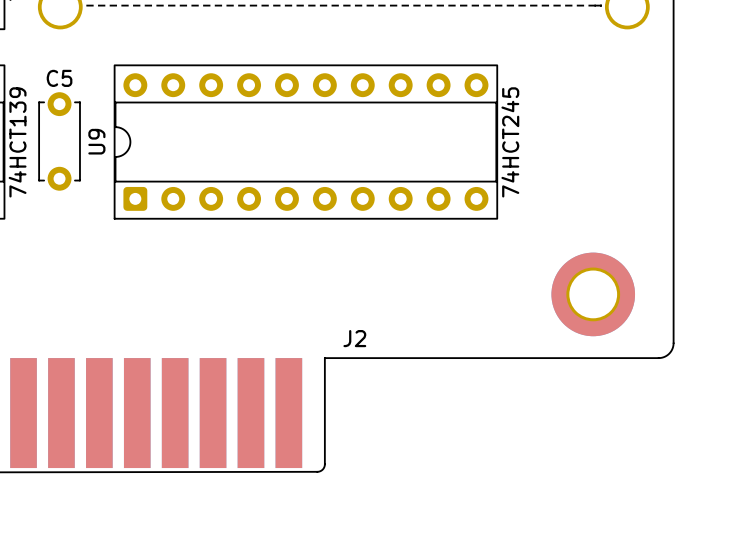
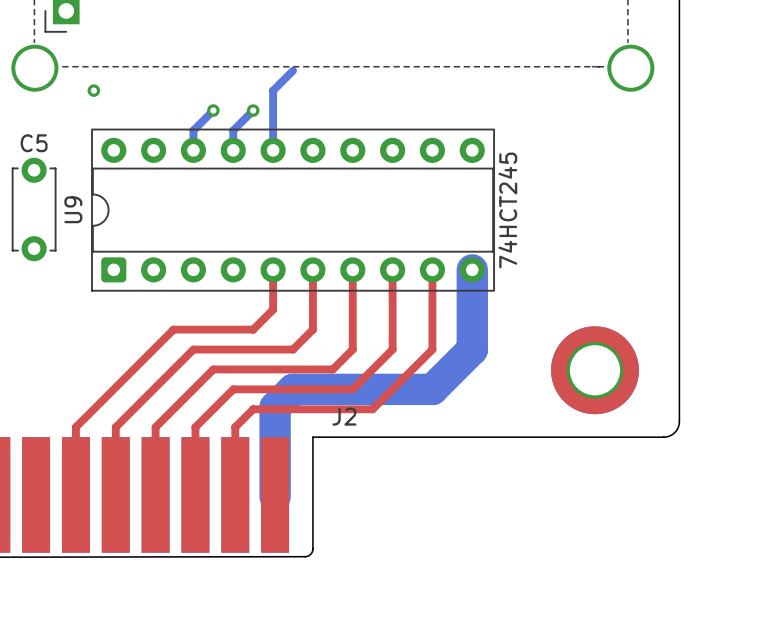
bottom track: none -> (293, 70) (273, 90) (273, 150)
via: none -> (93, 90)
bottom track: none -> (213, 110) (193, 130) (193, 150)
via: none -> (213, 110)
bottom track: none -> (253, 110) (233, 130) (233, 150)
via: none -> (253, 110)
top track: none -> (273, 269) (273, 309) (253, 329) (173, 329) (75, 427) (75, 496)
top track: none -> (312, 269) (312, 329) (293, 349) (193, 349) (115, 427) (115, 496)
top track: none -> (352, 269) (352, 349) (332, 369) (213, 369) (155, 427) (155, 496)
top track: none -> (392, 269) (392, 349) (352, 389) (233, 389) (195, 427) (195, 496)
top track: none -> (432, 269) (432, 349) (372, 409) (253, 409) (235, 427) (235, 496)
bottom track: none -> (472, 269) (472, 349) (432, 389) (293, 389) (275, 407) (275, 496)

